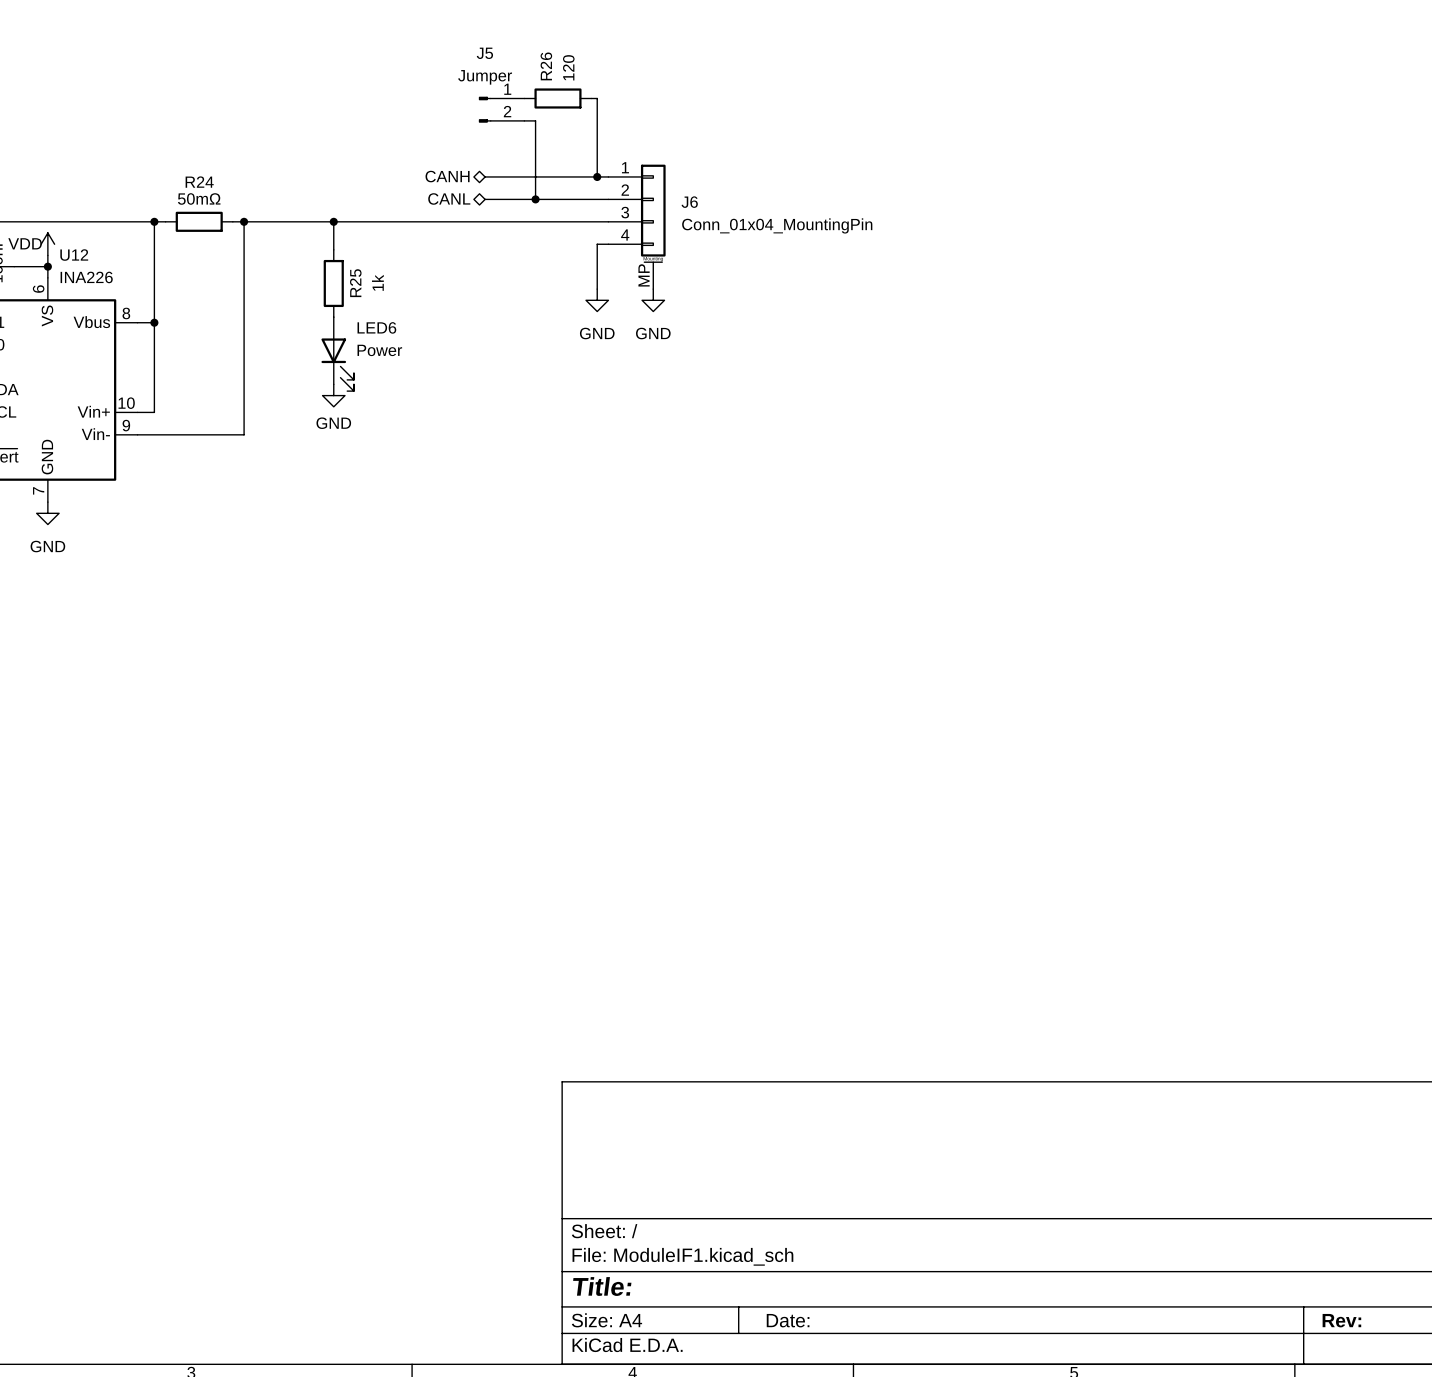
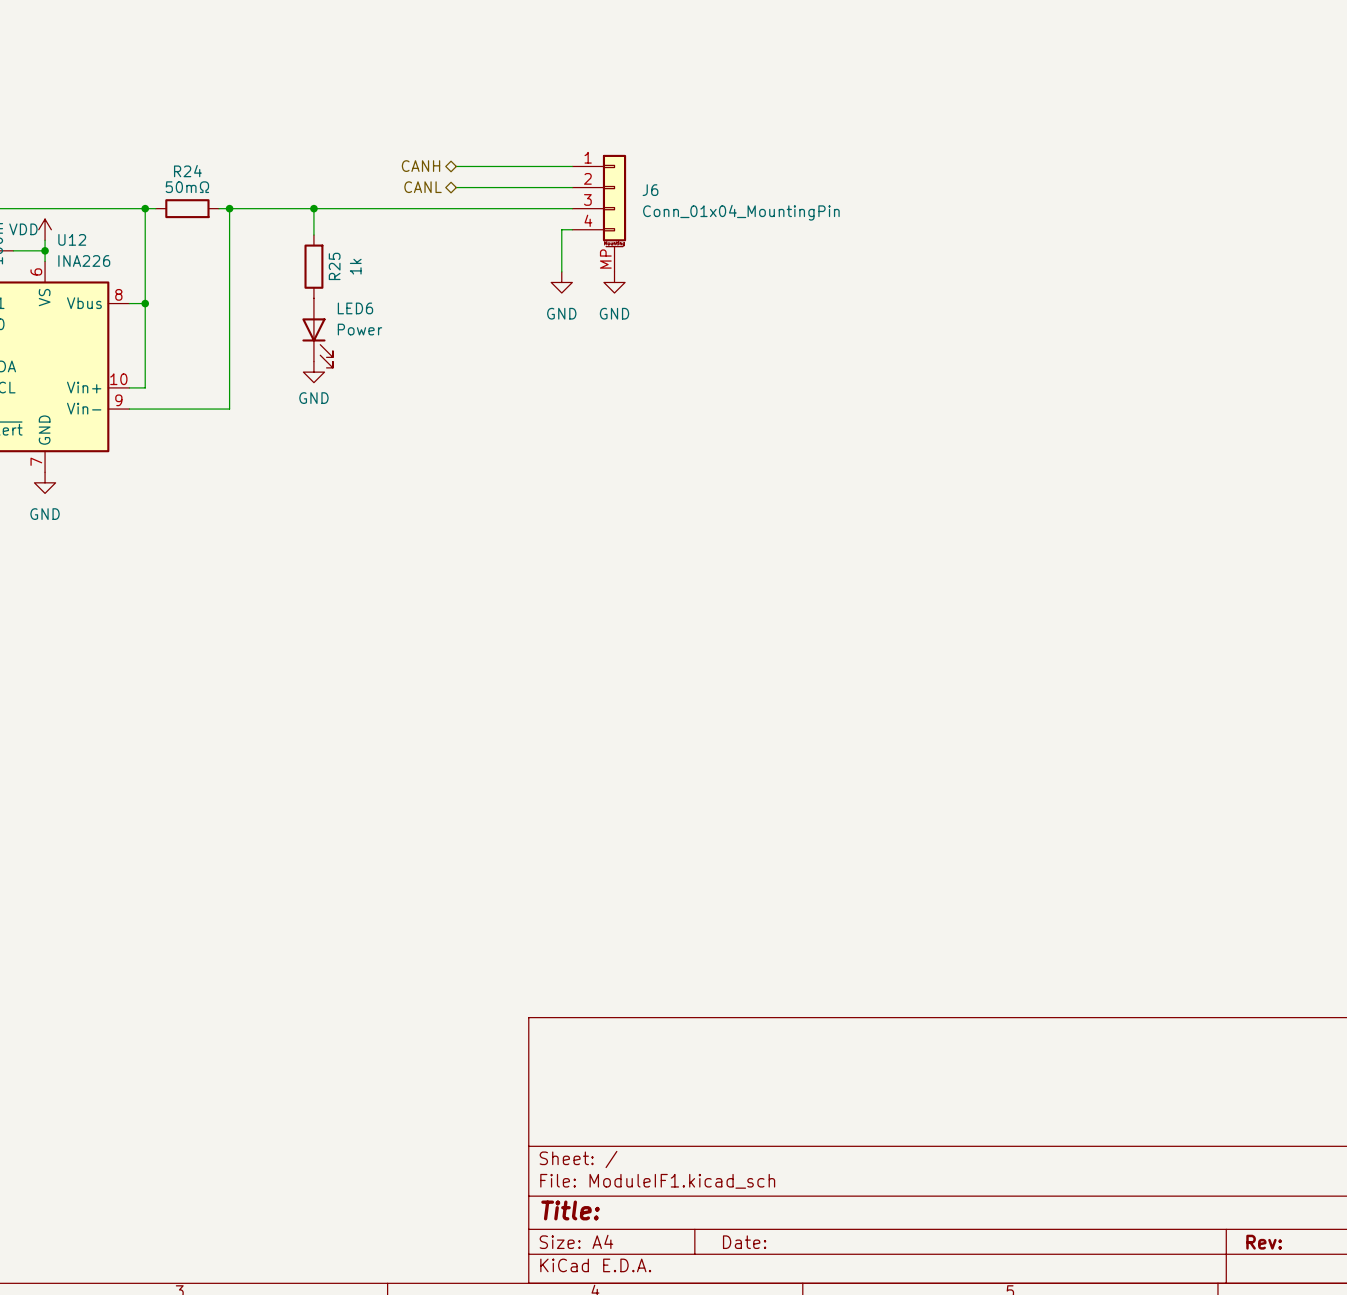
R26: 120 (557, 98) -> none
wire: (591, 98) (597, 98) (597, 176) -> none
J5: Jumper (501, 109) -> none
wire: (524, 120) (535, 120) (535, 199) -> none
junction: (597, 176) -> none
junction: (535, 199) -> none

